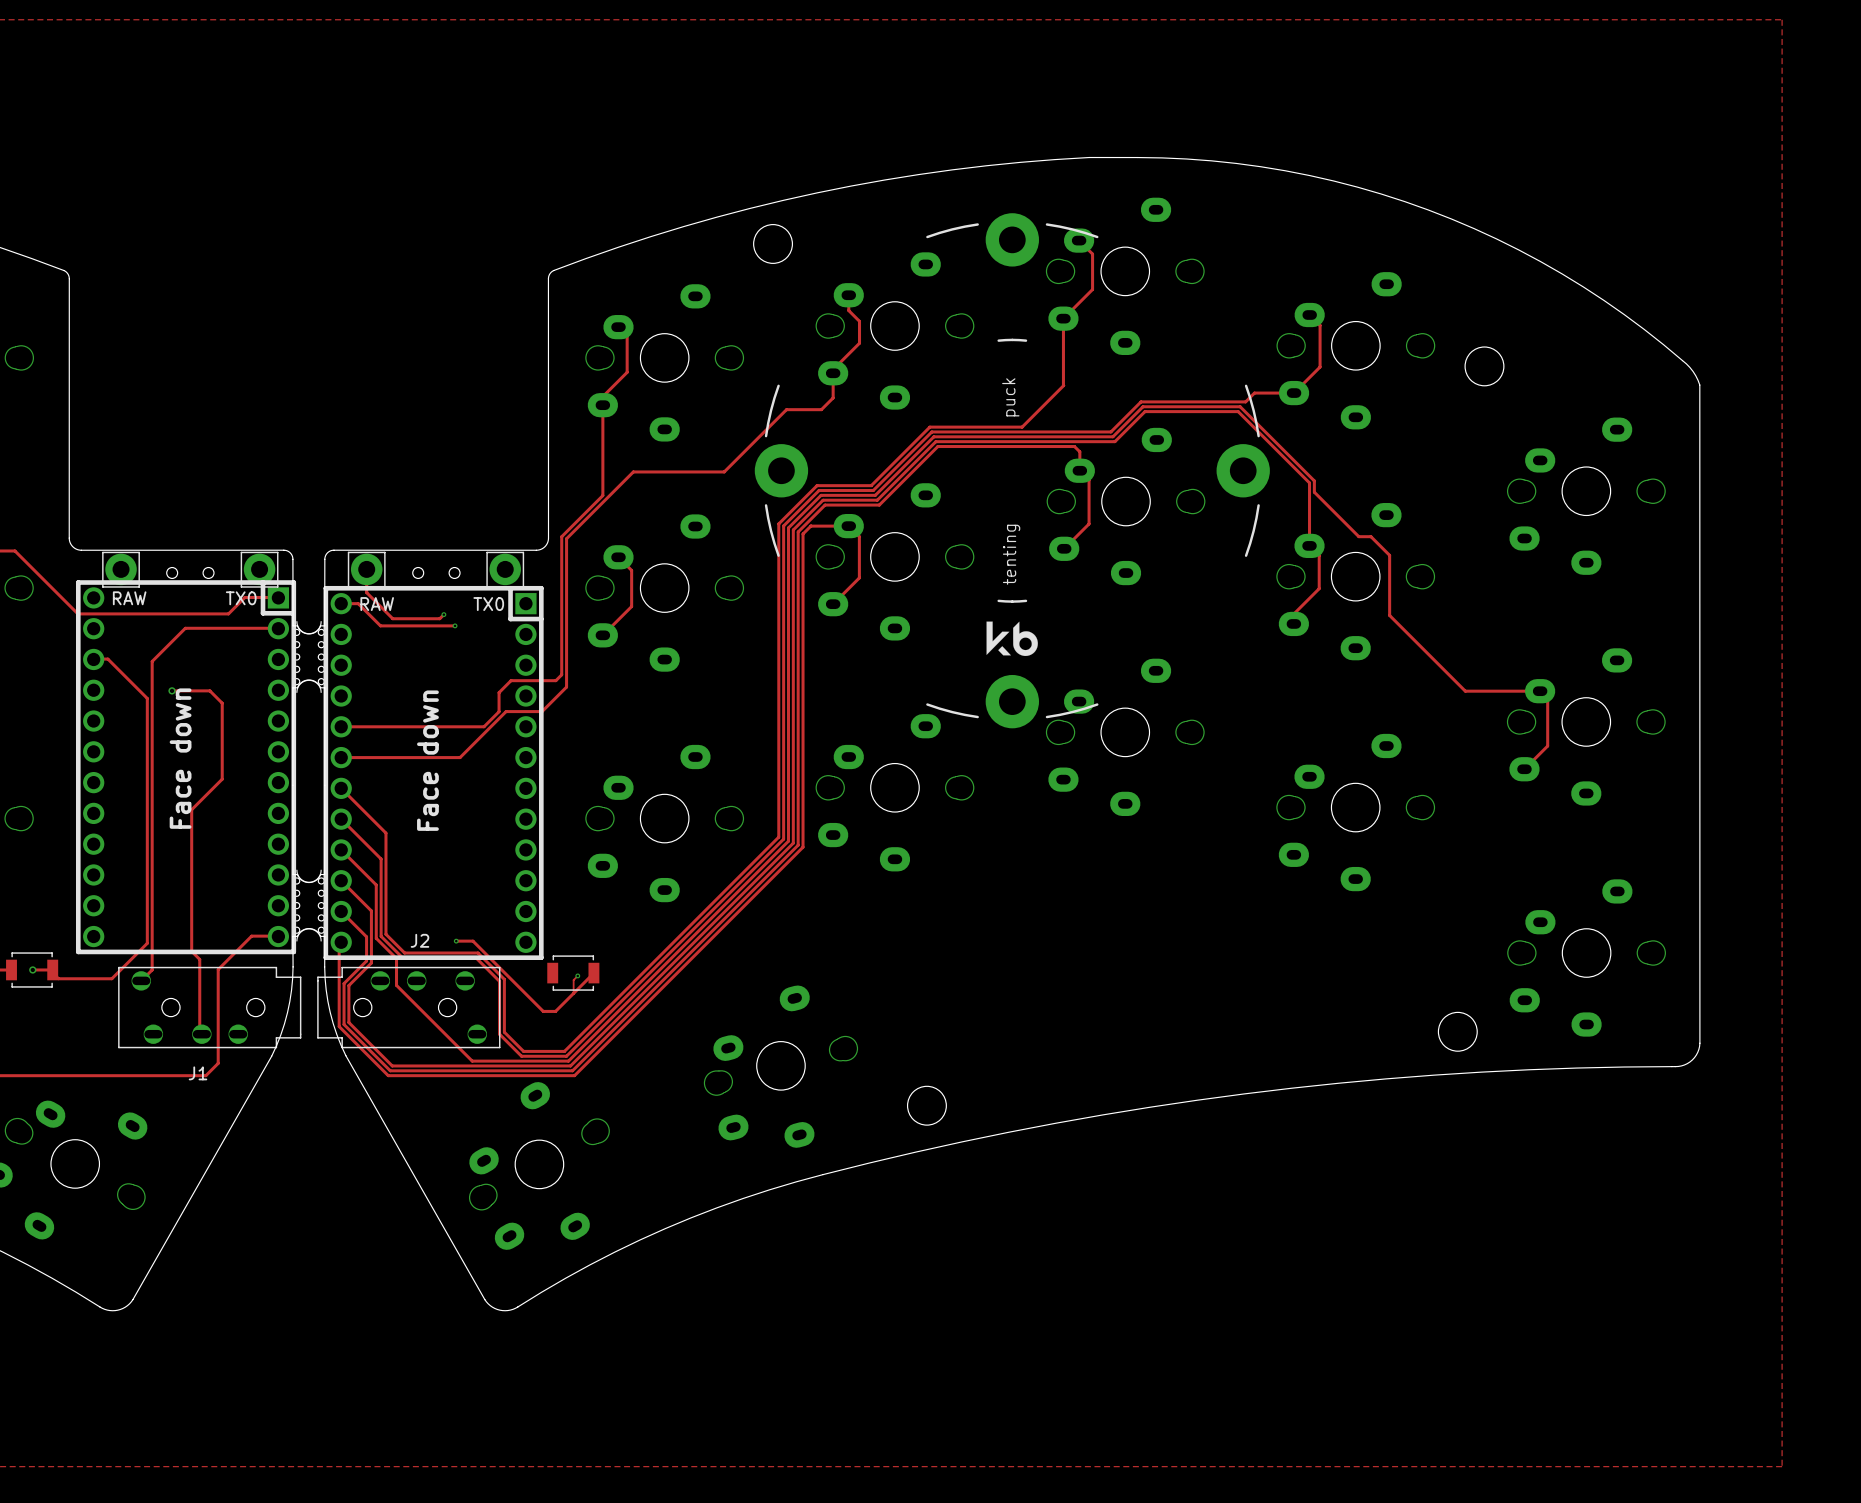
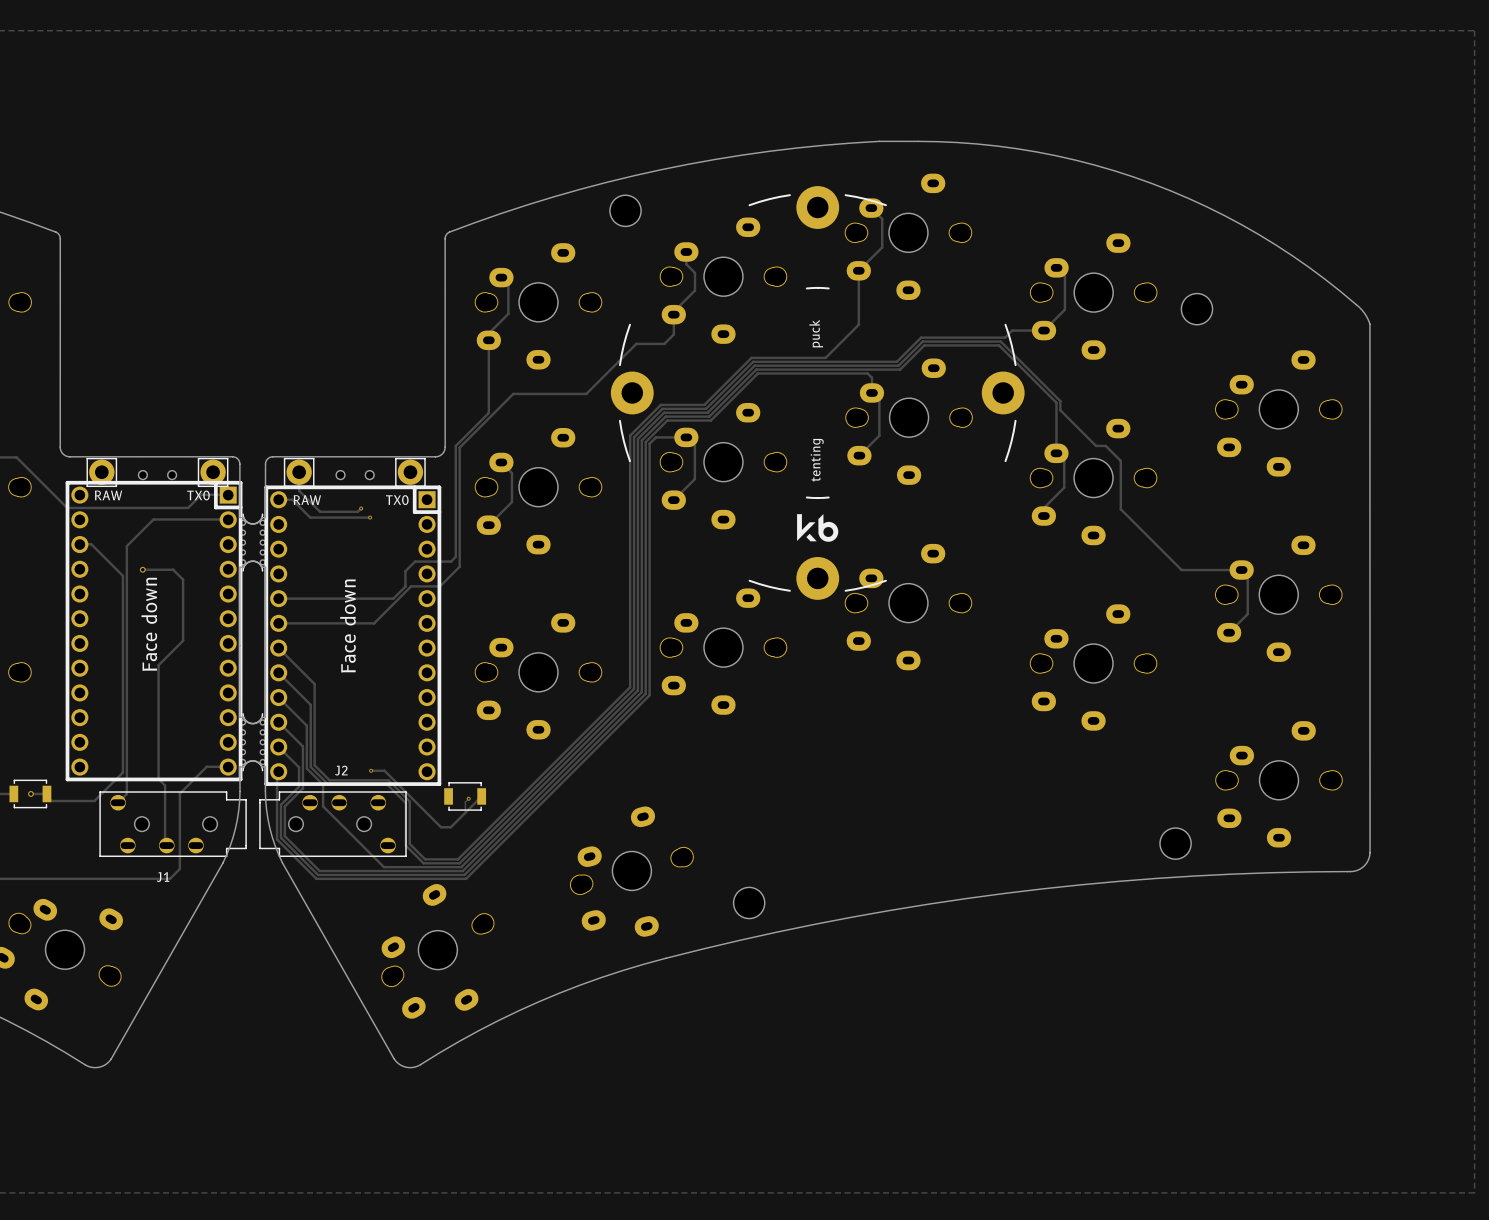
zone outline: (1782, 19) (1782, 1466) -> (1436, 30) (1474, 30) (1474, 1192) (1436, 1192)

